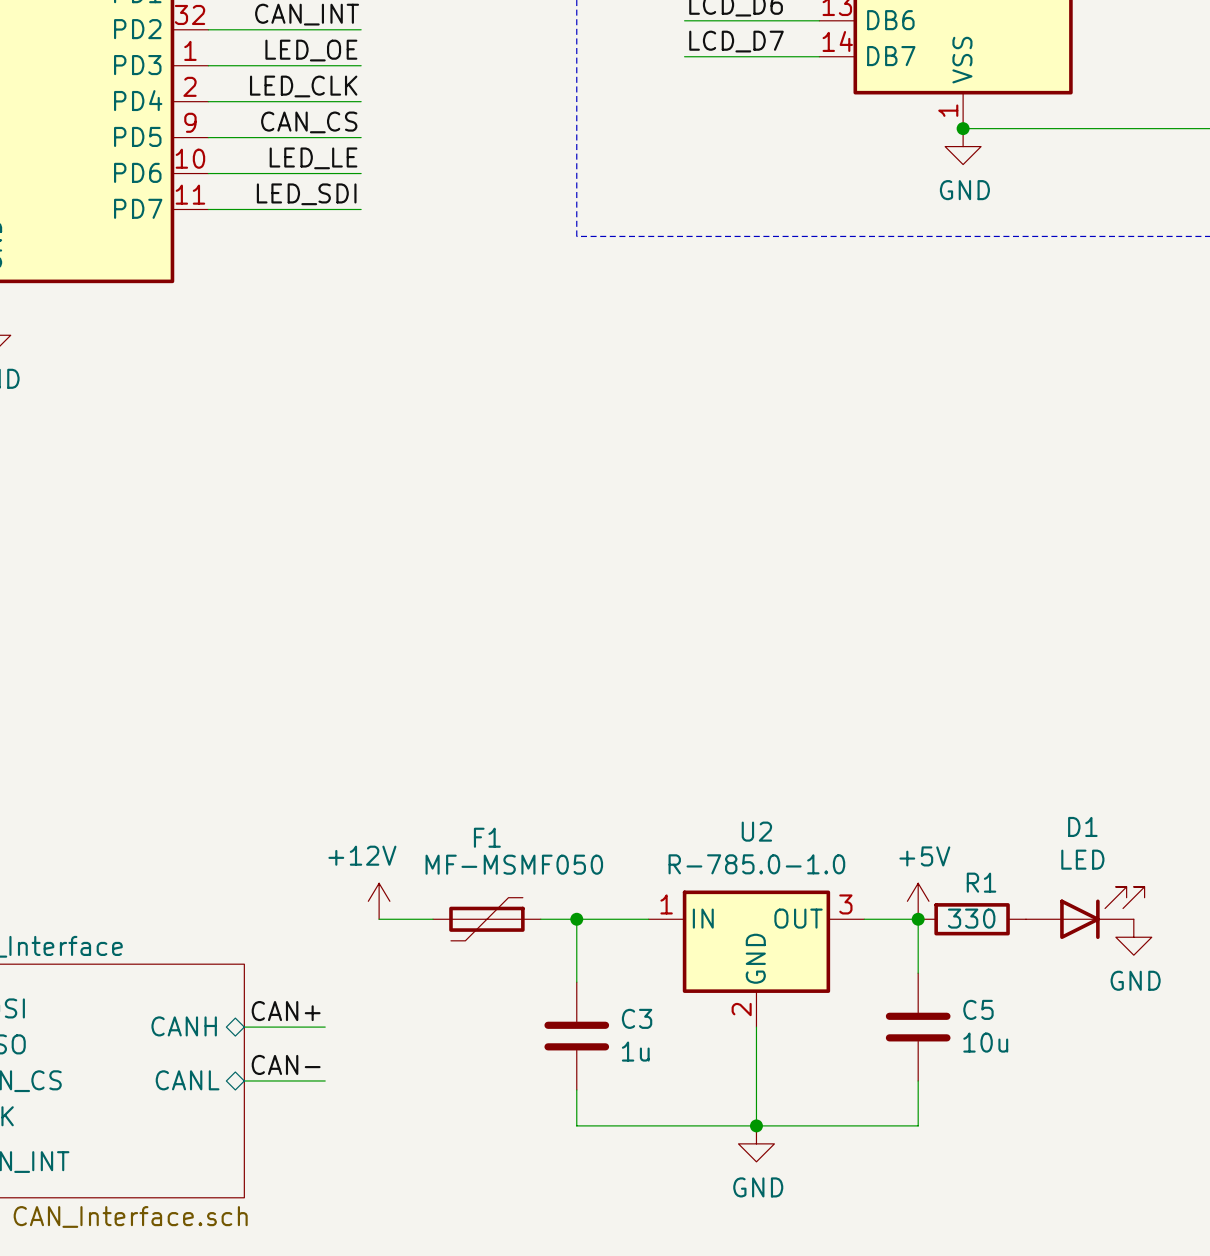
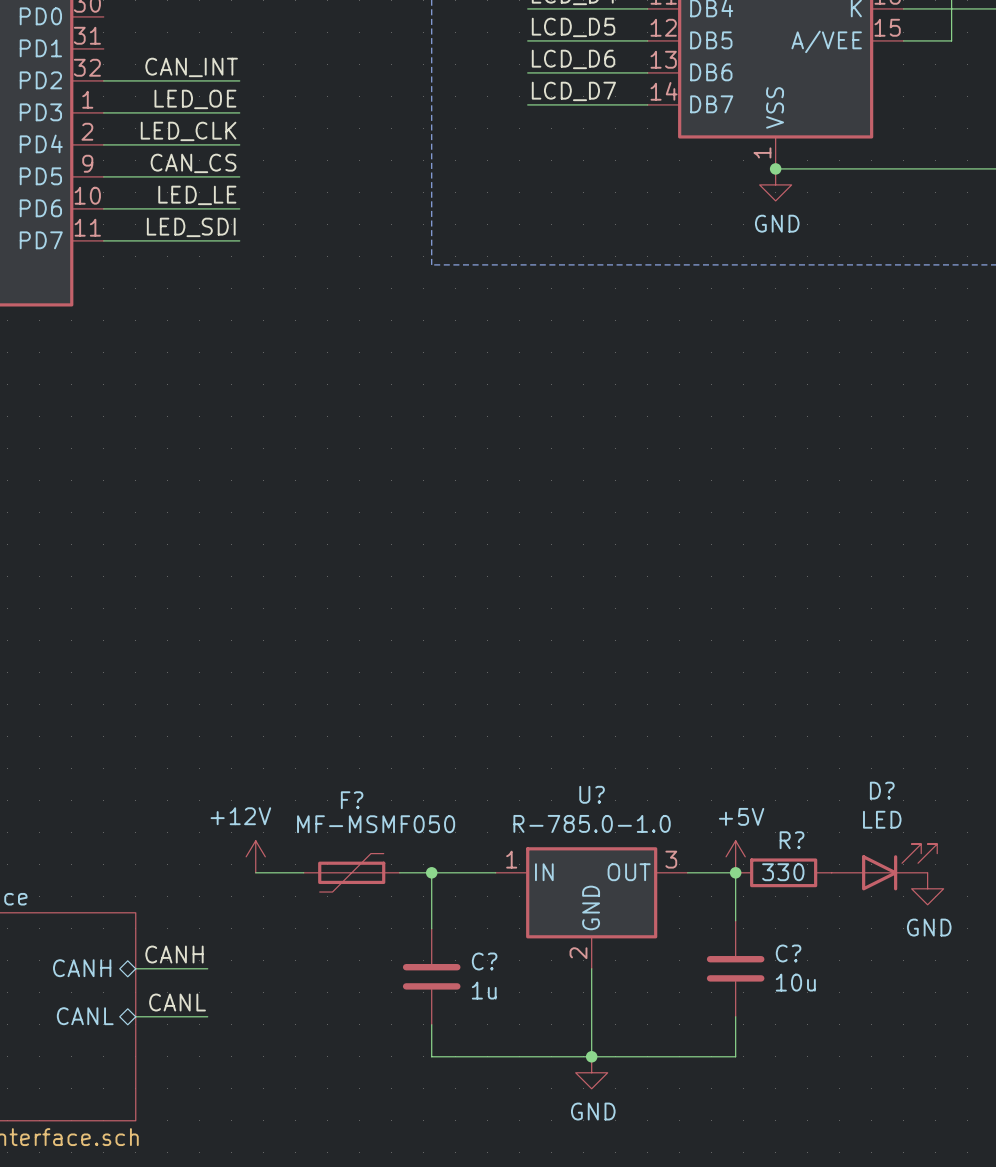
D1 name: D1 (1082, 826) -> D? (882, 790)
U2 name: U2 (756, 831) -> U? (592, 794)
F1 name: F1 (487, 837) -> F? (352, 800)
R1 name: R1 (981, 882) -> R? (792, 840)
C5 name: C5 (978, 1009) -> C? (788, 953)
label: CAN+ (286, 1011) -> CANH (174, 954)
C3 name: C3 (637, 1018) -> C? (484, 961)
label: CAN- (286, 1064) -> CANL (177, 1002)

